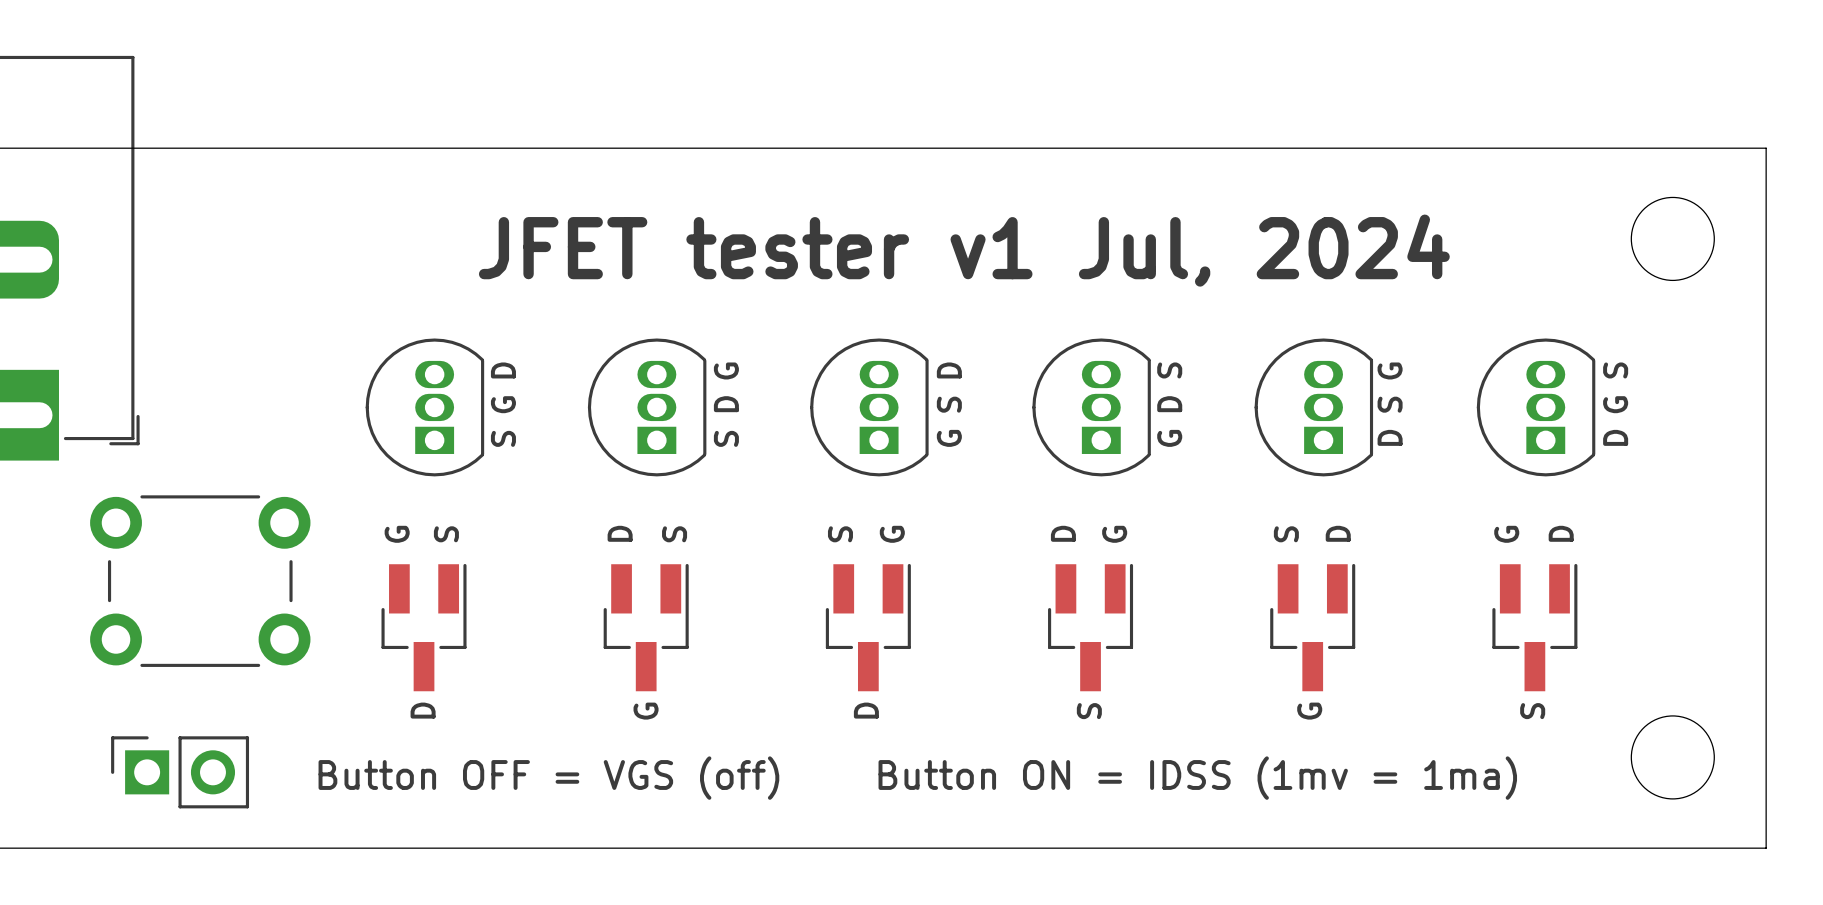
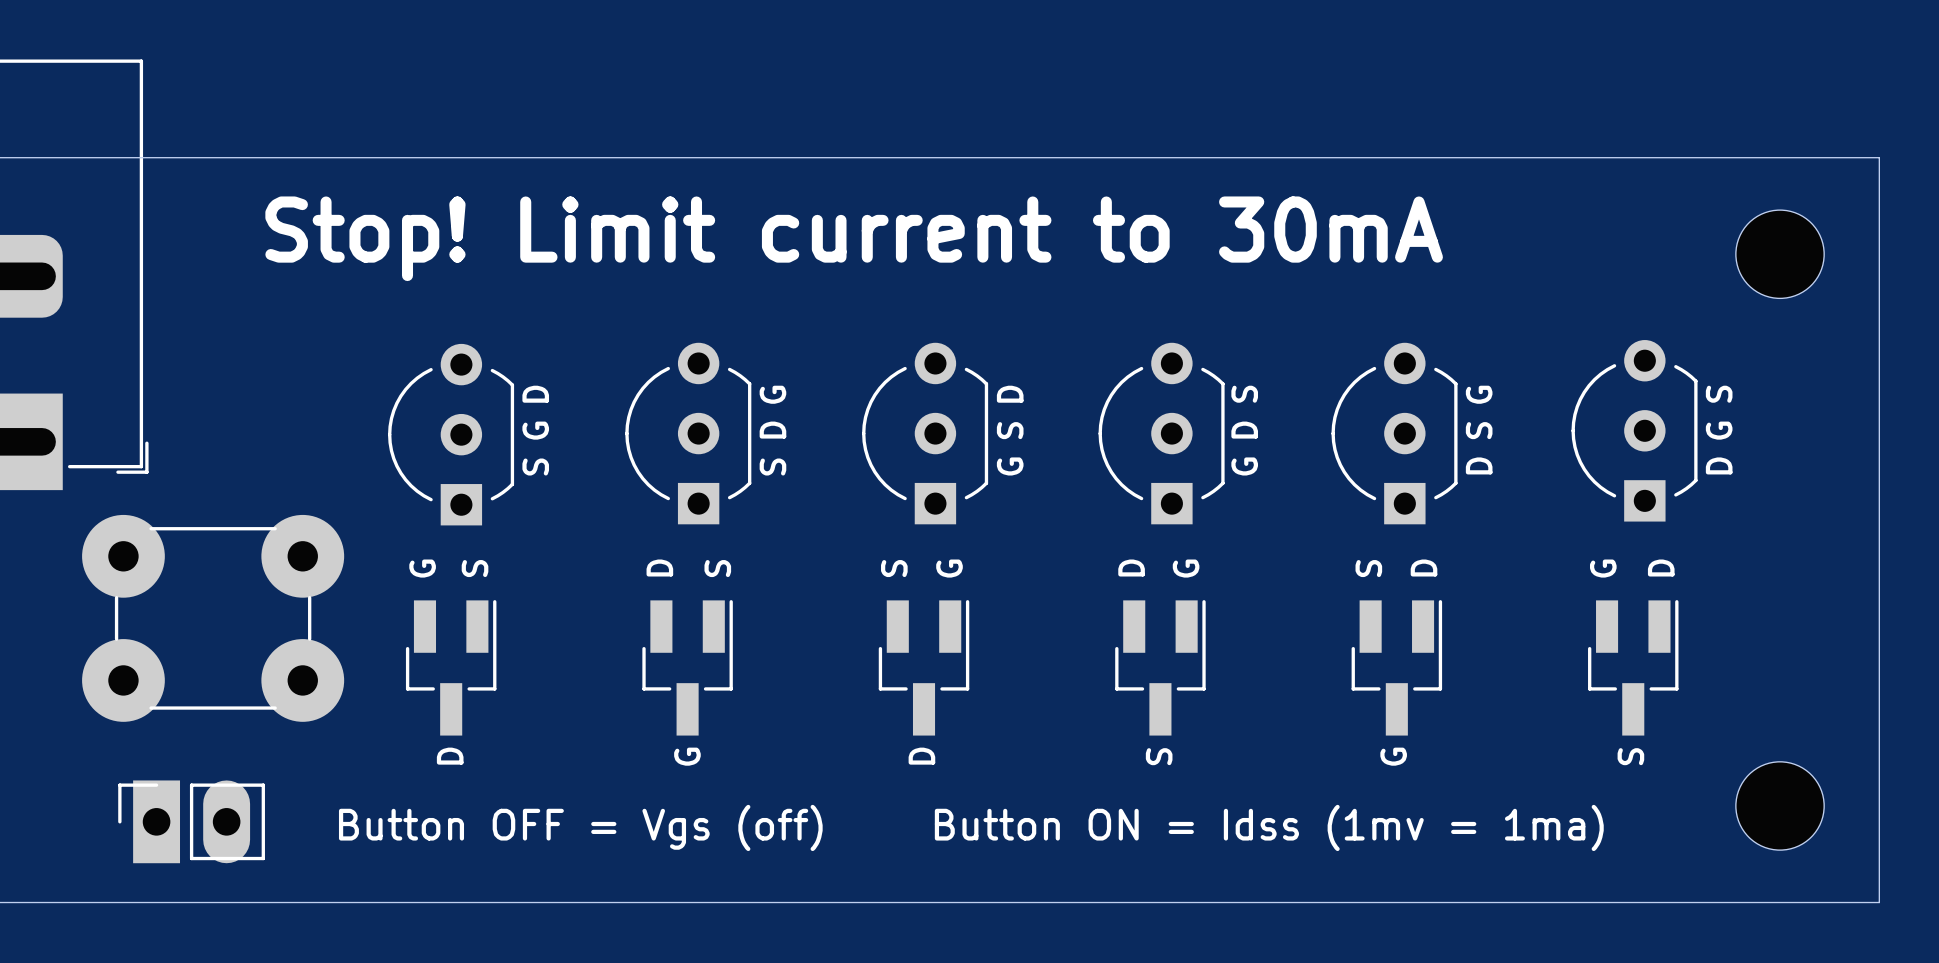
text: none -> Stop! Limit current to 30mA (854, 238)
text: JFET tester v1 Jul, 2024 (964, 250) -> none
part footprint: [365, 338, 485, 477] -> [388, 343, 515, 526]
part footprint: [587, 338, 707, 477] -> [625, 342, 752, 525]
part footprint: [810, 338, 929, 477] -> [862, 342, 989, 525]
part footprint: [1032, 338, 1151, 477] -> [1098, 342, 1225, 525]
part footprint: [1254, 338, 1374, 477] -> [1331, 342, 1458, 525]
part footprint: [1476, 338, 1596, 477] -> [1571, 340, 1698, 522]
part footprint: [90, 495, 311, 667] -> [82, 514, 345, 722]
part footprint: [111, 736, 250, 809] -> [118, 780, 265, 864]
text: Button OFF = VGS (off) (548, 778) -> Button OFF = Vgs (off) (580, 827)
text: Button ON = IDSS (1mv = 1ma) (1197, 778) -> Button ON = Idss (1mv = 1ma) (1269, 827)

